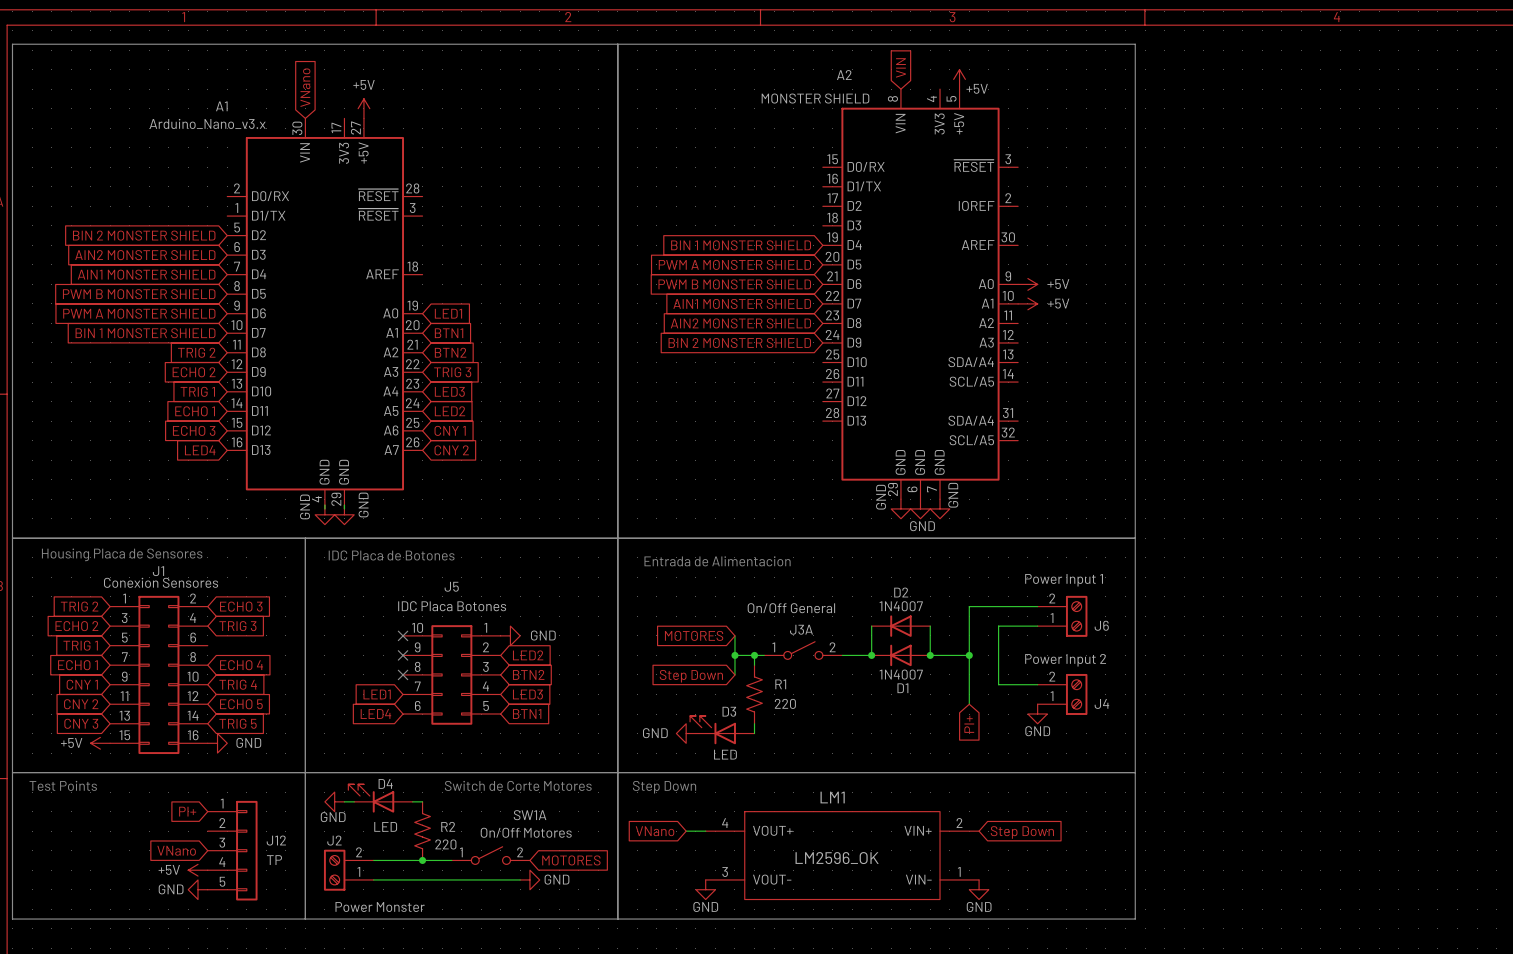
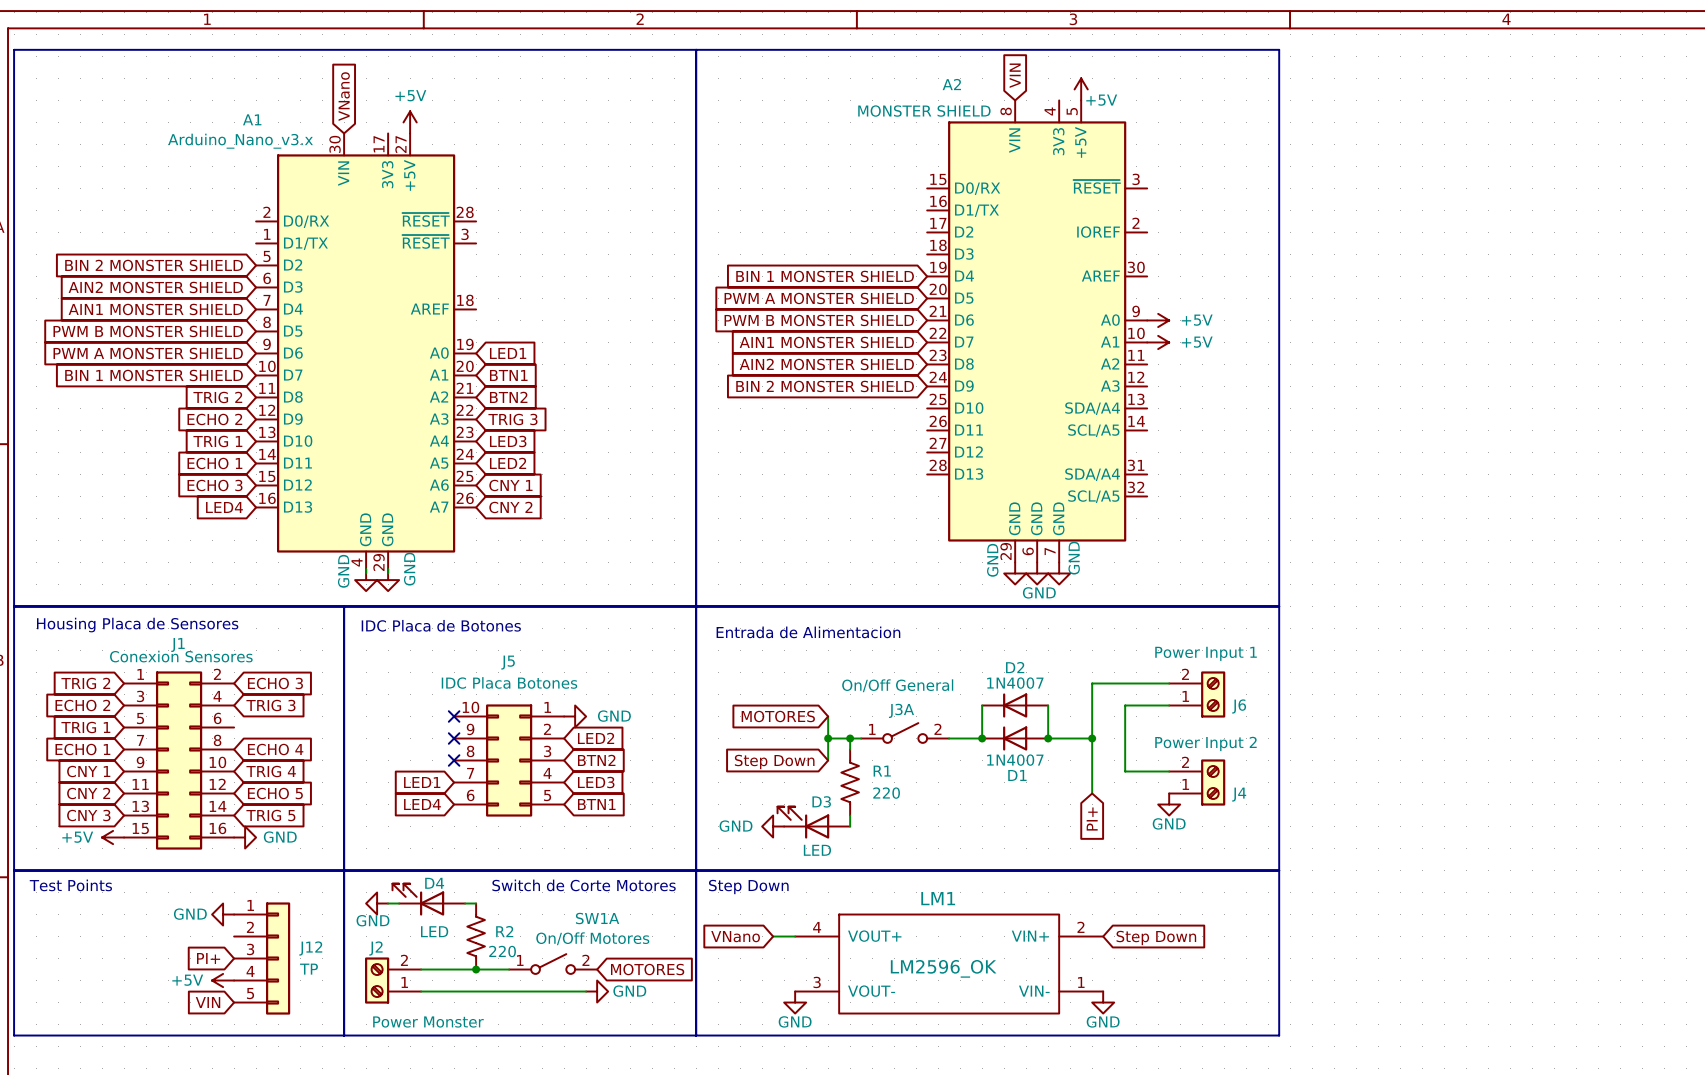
global label: PI+ (187, 811) -> none
global label: VNano (176, 850) -> PI+ (208, 958)
global label: none -> VIN (208, 1002)
power symbol position: GND (197, 889) -> GND (223, 914)

